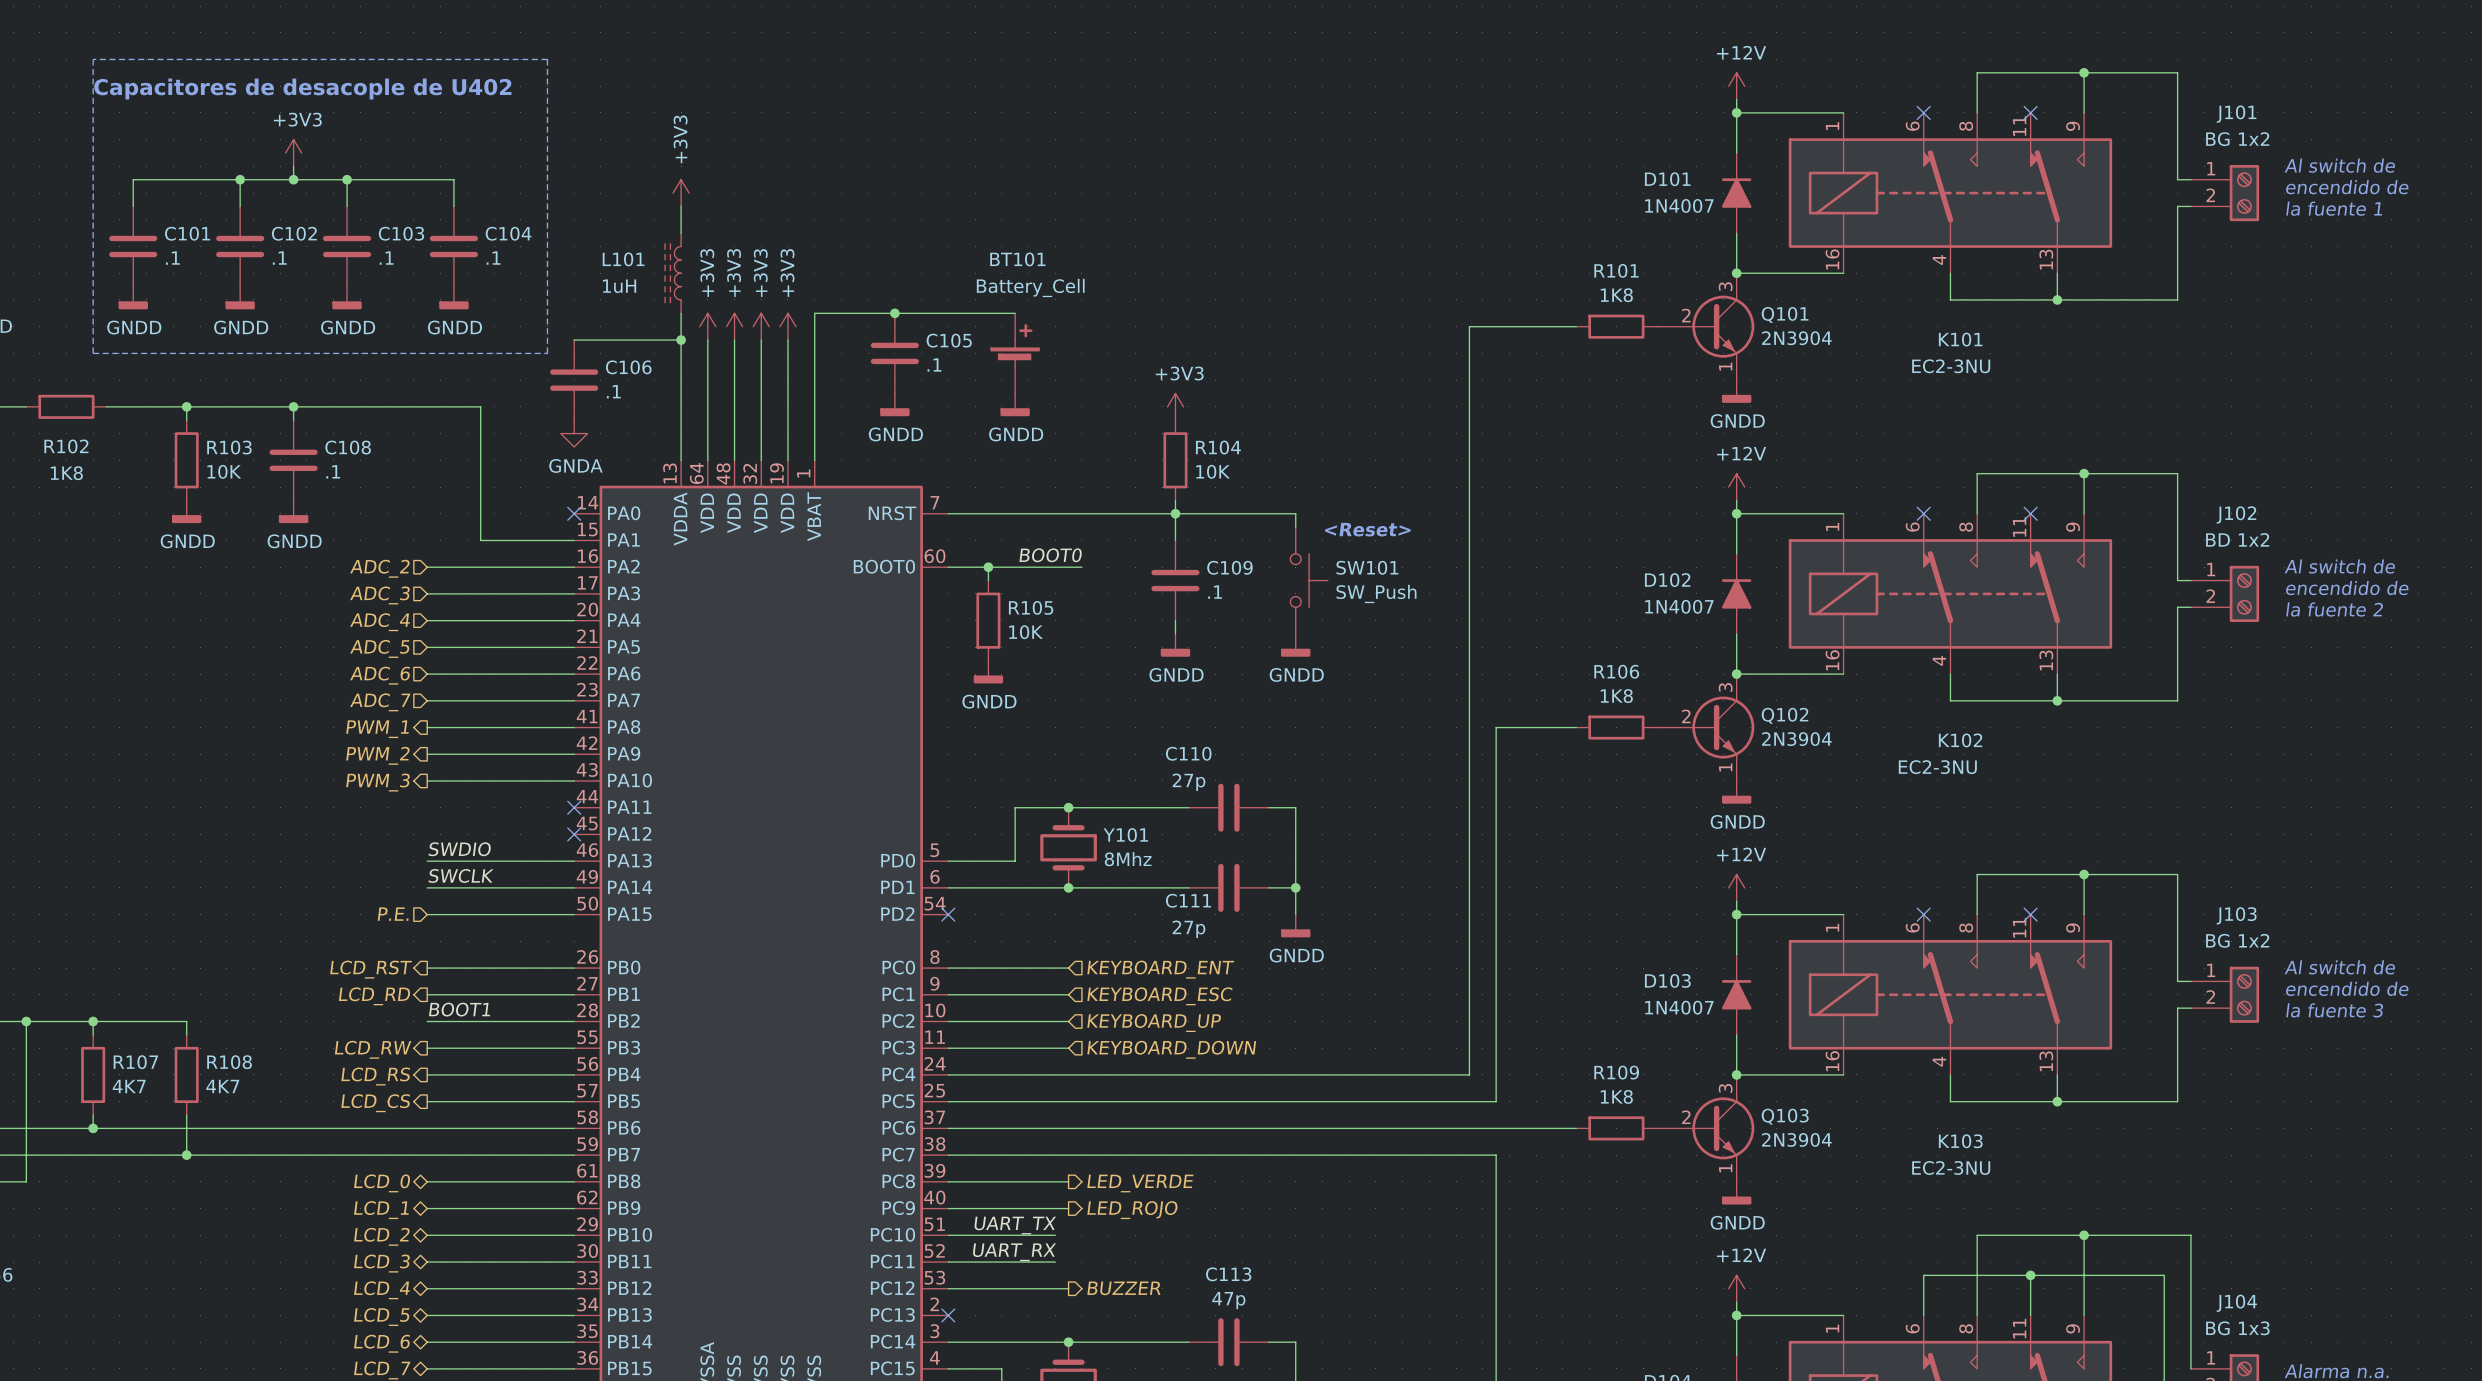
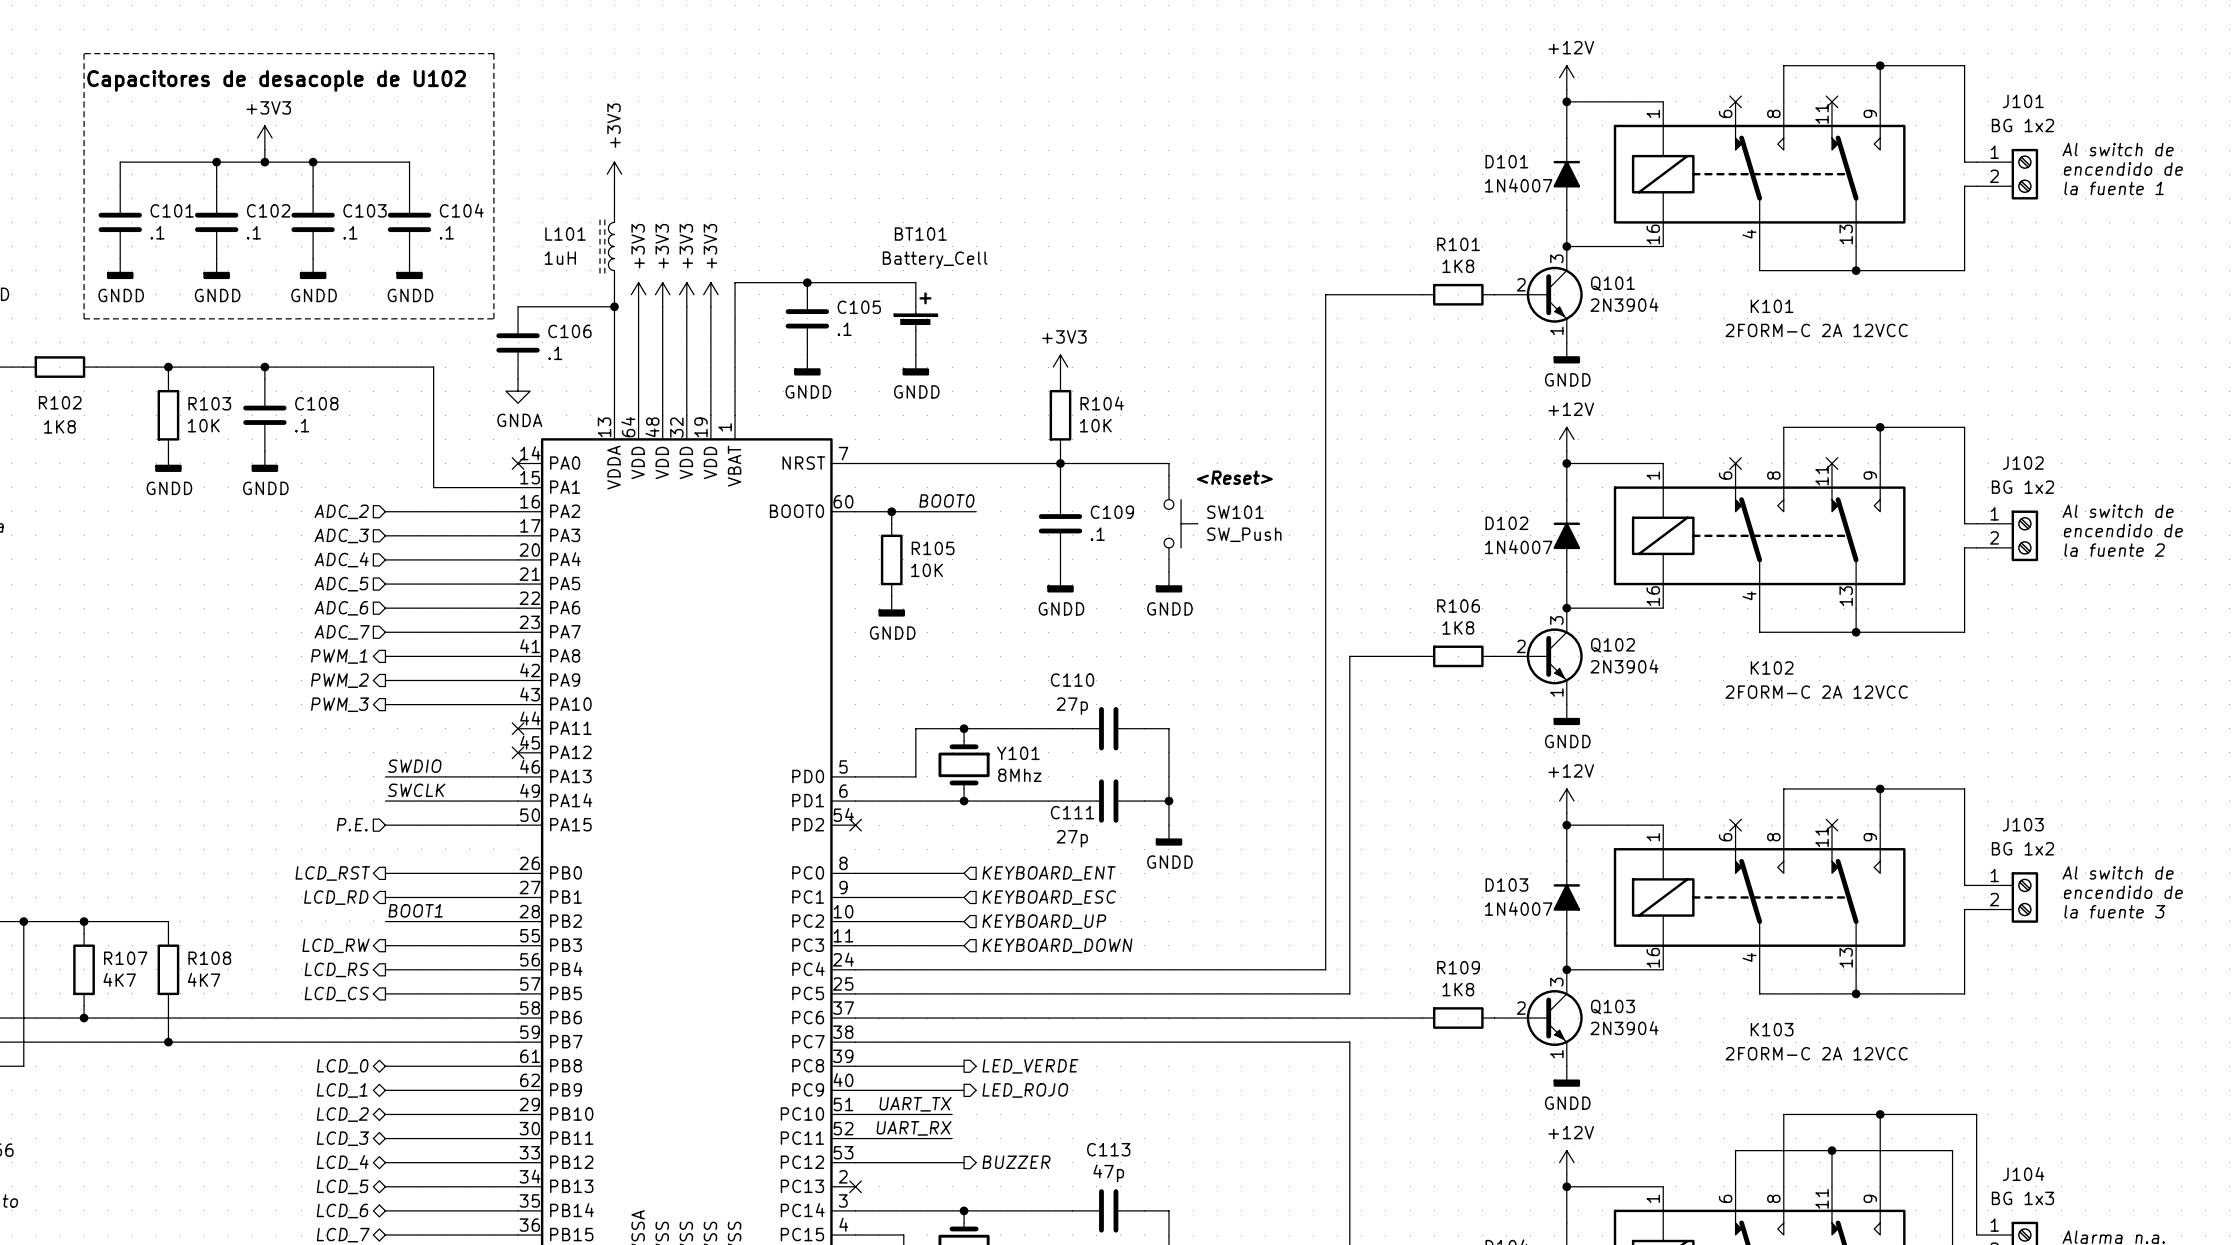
text: Capacitores de desacople de U402 (302, 89) -> Capacitores de desacople de U102 (276, 80)
K101 value: EC2-3NU (1951, 366) -> 2FORM-C 2A 12VCC (1816, 330)
J102 value: BD 1x2 (2237, 539) -> BG 1x2 (2022, 487)
K102 value: EC2-3NU (1937, 767) -> 2FORM-C 2A 12VCC (1816, 692)
K103 value: EC2-3NU (1951, 1167) -> 2FORM-C 2A 12VCC (1816, 1053)

